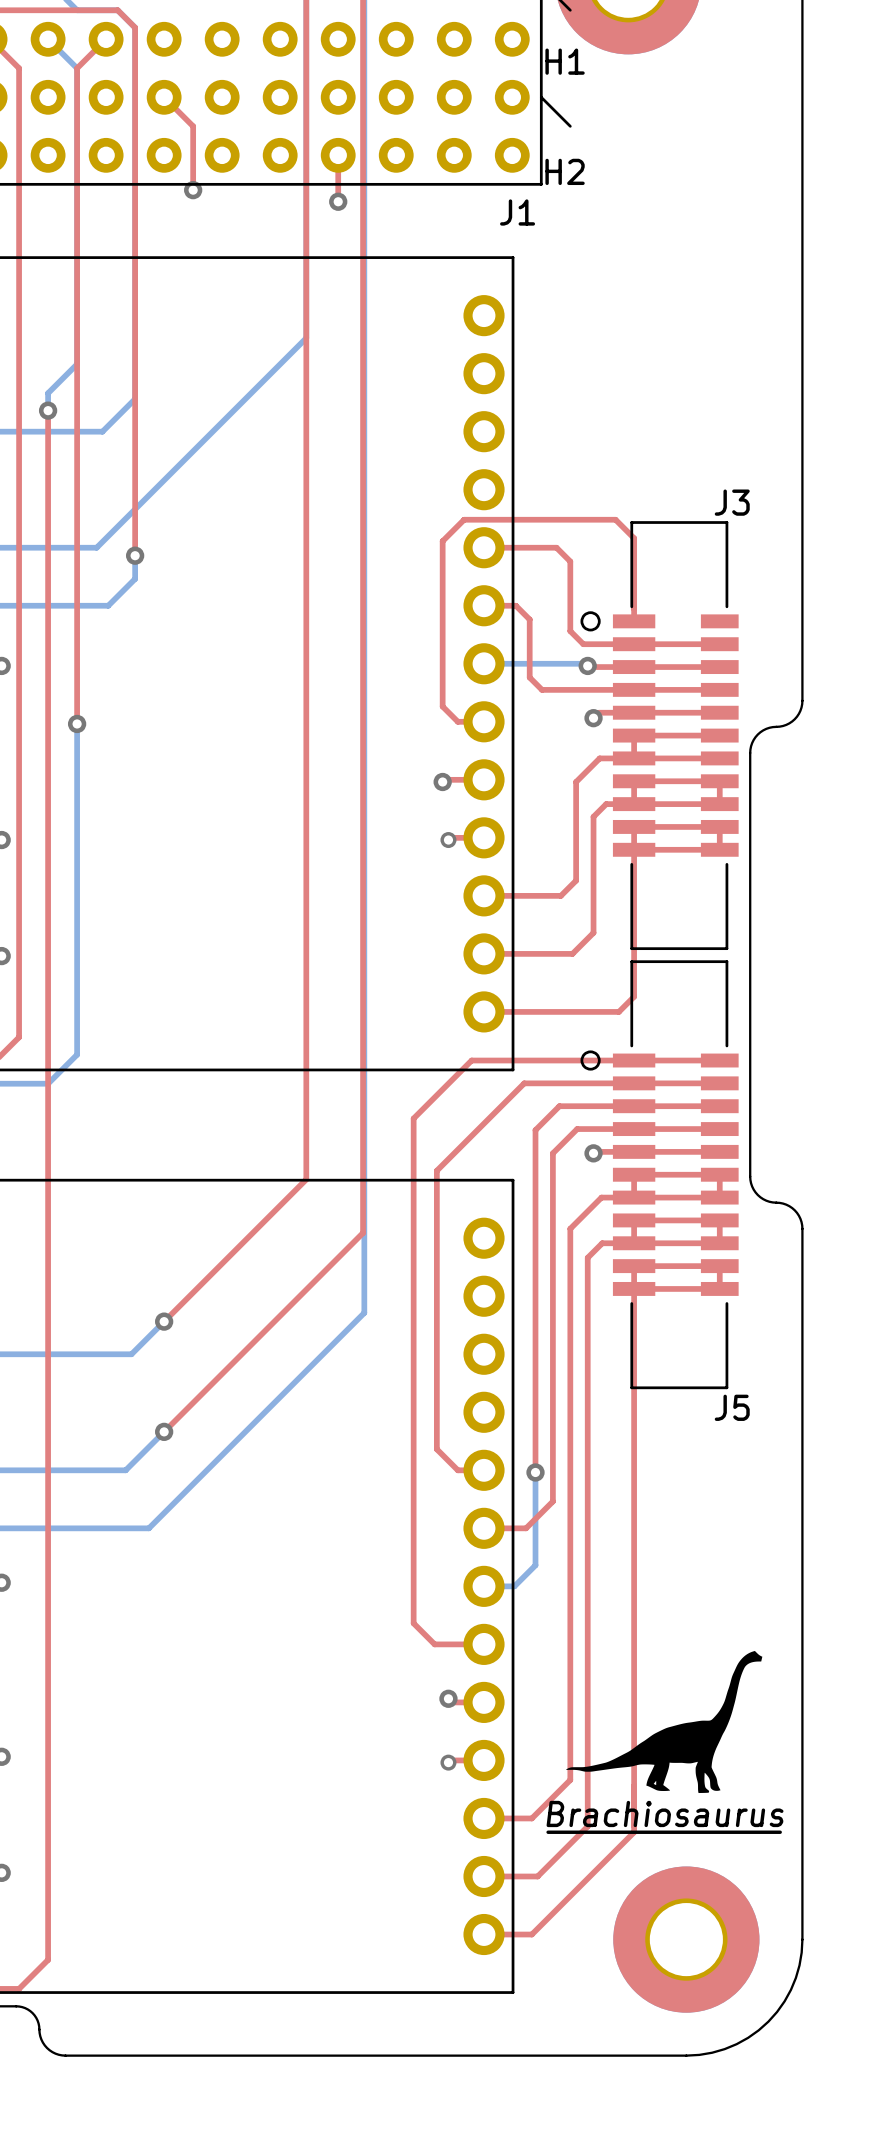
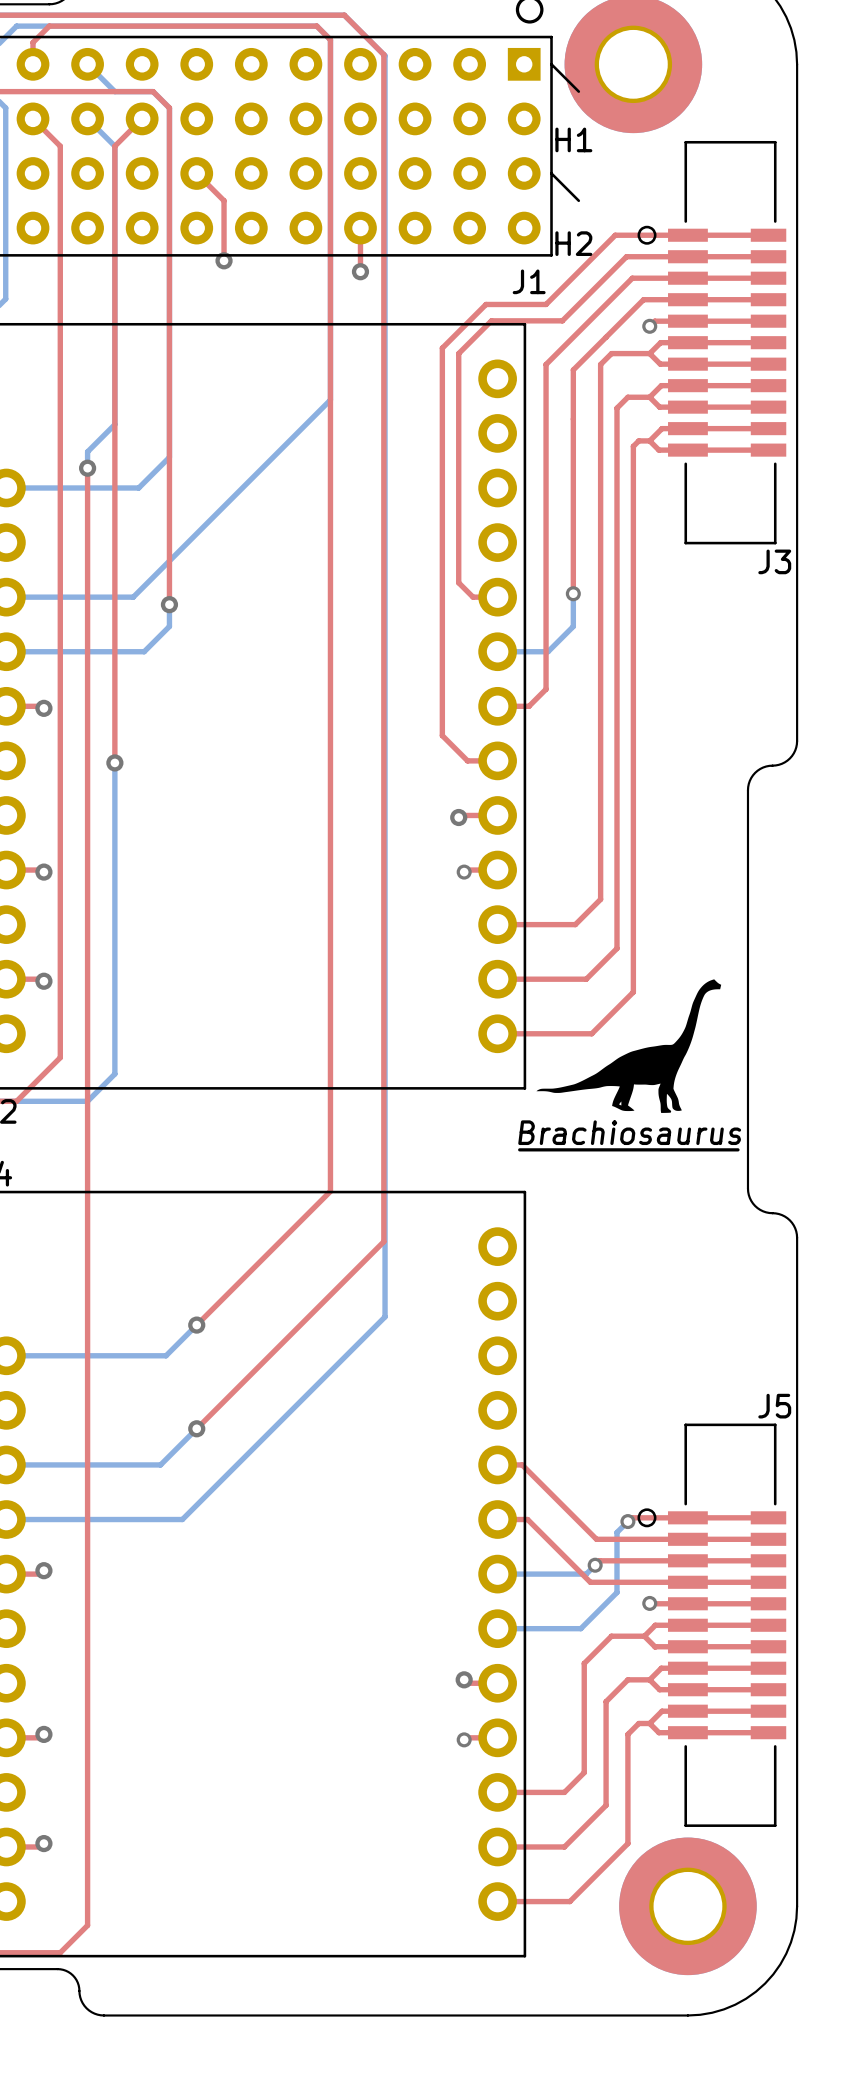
top track: none -> (768, 278) (632, 278) (546, 364) (546, 689) (528, 706) (497, 706)
top track: none -> (768, 299) (643, 299) (573, 369) (573, 593)
via: none -> (649, 326)
top track: none -> (768, 342) (660, 342) (649, 353)
top track: none -> (649, 353) (660, 364) (768, 364)
top track: none -> (768, 385) (661, 385) (649, 397)
top track: none -> (649, 397) (627, 397) (616, 408) (616, 948) (586, 979) (580, 979)
top track: none -> (649, 397) (659, 407) (768, 407)
top track: none -> (768, 428) (662, 428) (649, 440)
top track: none -> (649, 440) (658, 450) (768, 450)
J3 name position: J3 (732, 502) -> J3 (774, 561)
bottom track: none -> (573, 593) (573, 626) (548, 651) (497, 651)
via: none -> (573, 593)
top track: (484, 547) (556, 547) (570, 561) (570, 631) (583, 644) (719, 644) -> (497, 597) (473, 597) (458, 582) (458, 353) (491, 320) (562, 320) (626, 256) (768, 256)
top track: (484, 605) (515, 605) (529, 619) (529, 677) (542, 689) (719, 689) -> none
top track: (634, 621) (634, 538) (615, 519) (464, 519) (442, 541) (442, 706) (457, 721) -> (768, 235) (615, 235) (546, 304) (486, 304) (442, 348) (442, 735) (467, 760) (473, 760)
bottom track: (484, 663) (585, 663) (587, 665) -> none
top track: (587, 665) (719, 667) -> none
via: (587, 665) -> none
top track: (719, 712) (598, 712) (593, 718) -> (768, 321) (654, 321) (649, 326)
via: (593, 718) -> none
J3 position: (659, 735) -> (711, 342)
top track: (719, 735) (634, 735) (634, 758) -> none
top track: (719, 758) (599, 758) (576, 782) (576, 880) (560, 895) -> none
top track: (634, 804) (634, 781) (719, 781) (719, 804) (606, 804) (593, 816) -> (649, 353) (611, 353) (600, 364) (600, 850)
top track: (634, 849) (719, 849) (719, 826) (634, 826) (634, 996) (618, 1011) (584, 1011) -> (649, 440) (638, 440) (633, 446) (633, 992) (591, 1033)
top track: (593, 869) (593, 932) (572, 953) -> (600, 899) (575, 924) (569, 924)
drawing: none -> [536, 979, 722, 1113]
top track: (719, 1060) (471, 1060) (413, 1118) (413, 1623) (434, 1644) (484, 1644) -> none
top track: (719, 1083) (524, 1083) (436, 1170) (436, 1449) (457, 1470) (484, 1470) -> (768, 1539) (596, 1539) (522, 1464) (497, 1464)
top track: (719, 1106) (559, 1106) (535, 1130) (535, 1472) -> none
text: none -> Brachiosaurus (629, 1132)
top track: (719, 1129) (577, 1129) (552, 1153) (552, 1501) (526, 1528) (515, 1528) -> (768, 1582) (590, 1582) (527, 1519)
line: none -> (519, 1149) (738, 1149)
top track: (719, 1151) (593, 1153) -> none
via: (593, 1153) -> none
J5 position: (659, 1174) -> (711, 1625)
top track: (634, 1197) (634, 1174) (719, 1174) (719, 1197) (601, 1197) (570, 1228) (570, 1780) (531, 1818) -> (644, 1636) (611, 1636) (584, 1663) (584, 1772) (564, 1792) (542, 1792)
top track: (634, 1243) (634, 1220) (719, 1220) (719, 1243) (602, 1243) (587, 1257) (587, 1826) (537, 1876) -> (649, 1679) (627, 1679) (606, 1701) (606, 1805) (564, 1846) (548, 1846)
top track: (634, 1288) (719, 1288) (719, 1266) (634, 1266) (634, 1832) (531, 1934) -> (649, 1723) (638, 1723) (627, 1734) (627, 1843) (569, 1901) (542, 1901)
J5 name position: J5 (732, 1407) -> J5 (774, 1406)
bottom track: (535, 1472) (535, 1565) (514, 1586) -> (595, 1565) (586, 1574) (526, 1574)
via: (535, 1472) -> none
top track: none -> (768, 1517) (631, 1517) (627, 1521)
bottom track: none -> (627, 1521) (616, 1532) (616, 1592) (580, 1628) (497, 1628)
via: none -> (627, 1521)
top track: none -> (768, 1560) (599, 1560) (595, 1565)
via: none -> (595, 1565)
top track: none -> (649, 1603) (768, 1603)
via: none -> (649, 1603)
top track: none -> (768, 1625) (655, 1625) (644, 1636)
drawing: [565, 1650, 763, 1794] -> none
top track: none -> (644, 1636) (654, 1646)
top track: none -> (768, 1646) (655, 1647)
top track: none -> (768, 1668) (661, 1668) (649, 1679)
top track: none -> (649, 1679) (659, 1689) (768, 1689)
top track: none -> (768, 1711) (662, 1711) (649, 1723)
top track: none -> (649, 1723) (658, 1732) (768, 1732)
text: Brachiosaurus (665, 1813) -> none
line: (548, 1832) (780, 1832) -> none

